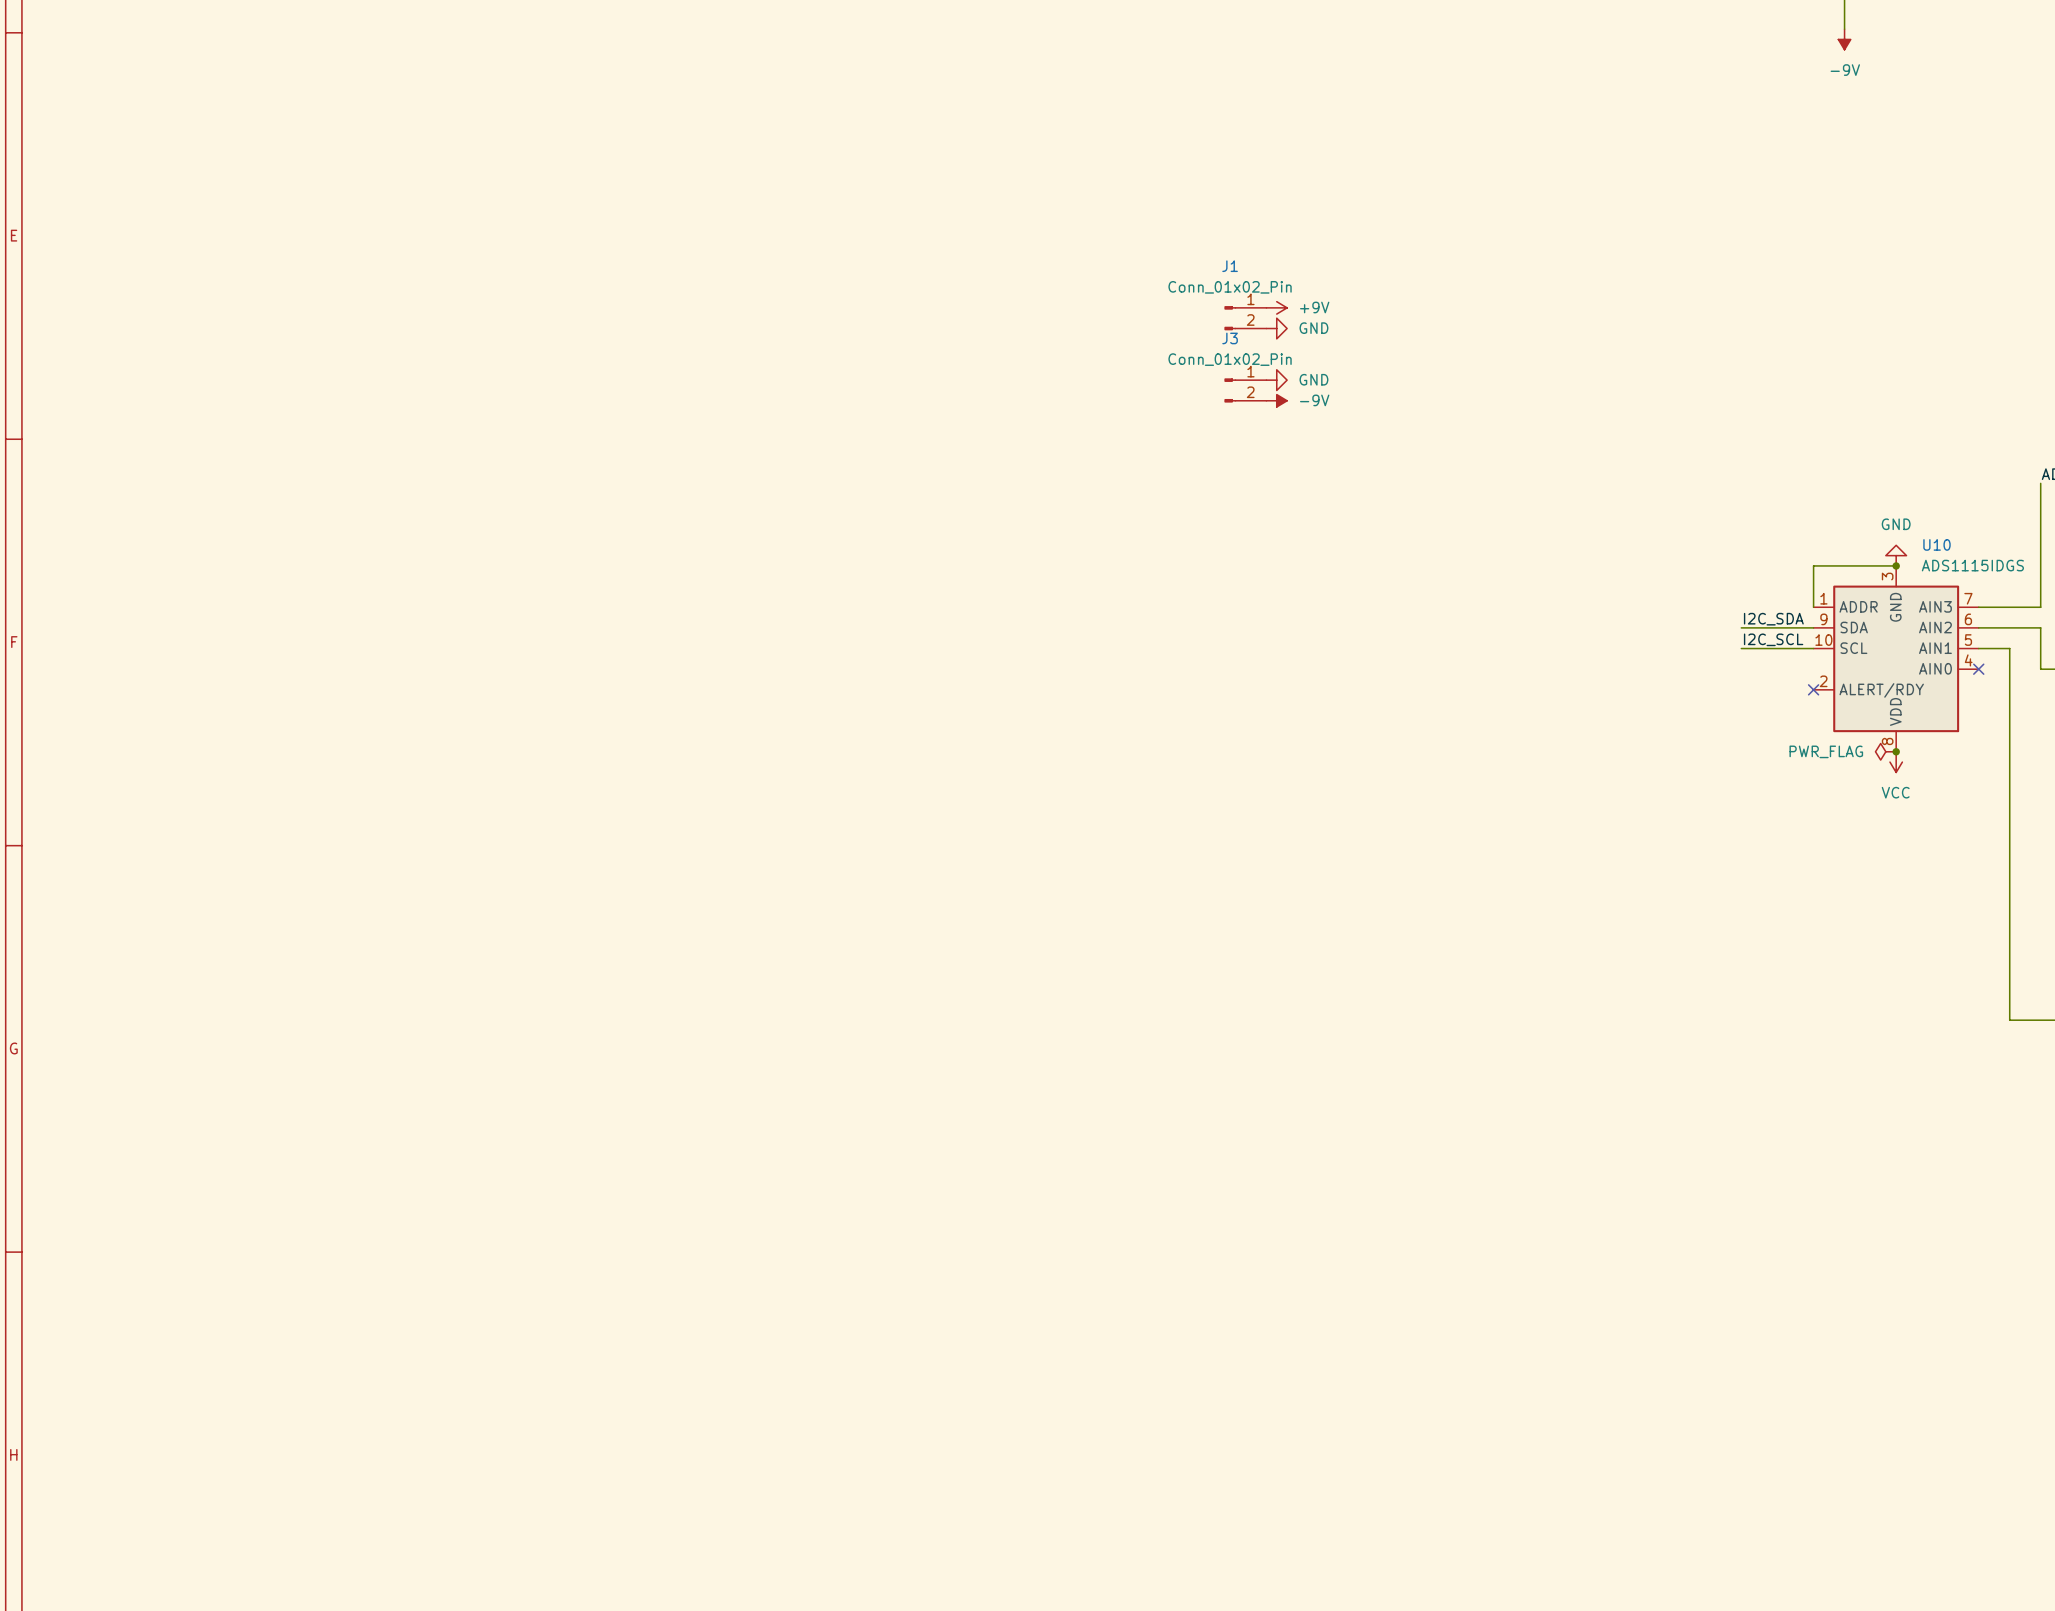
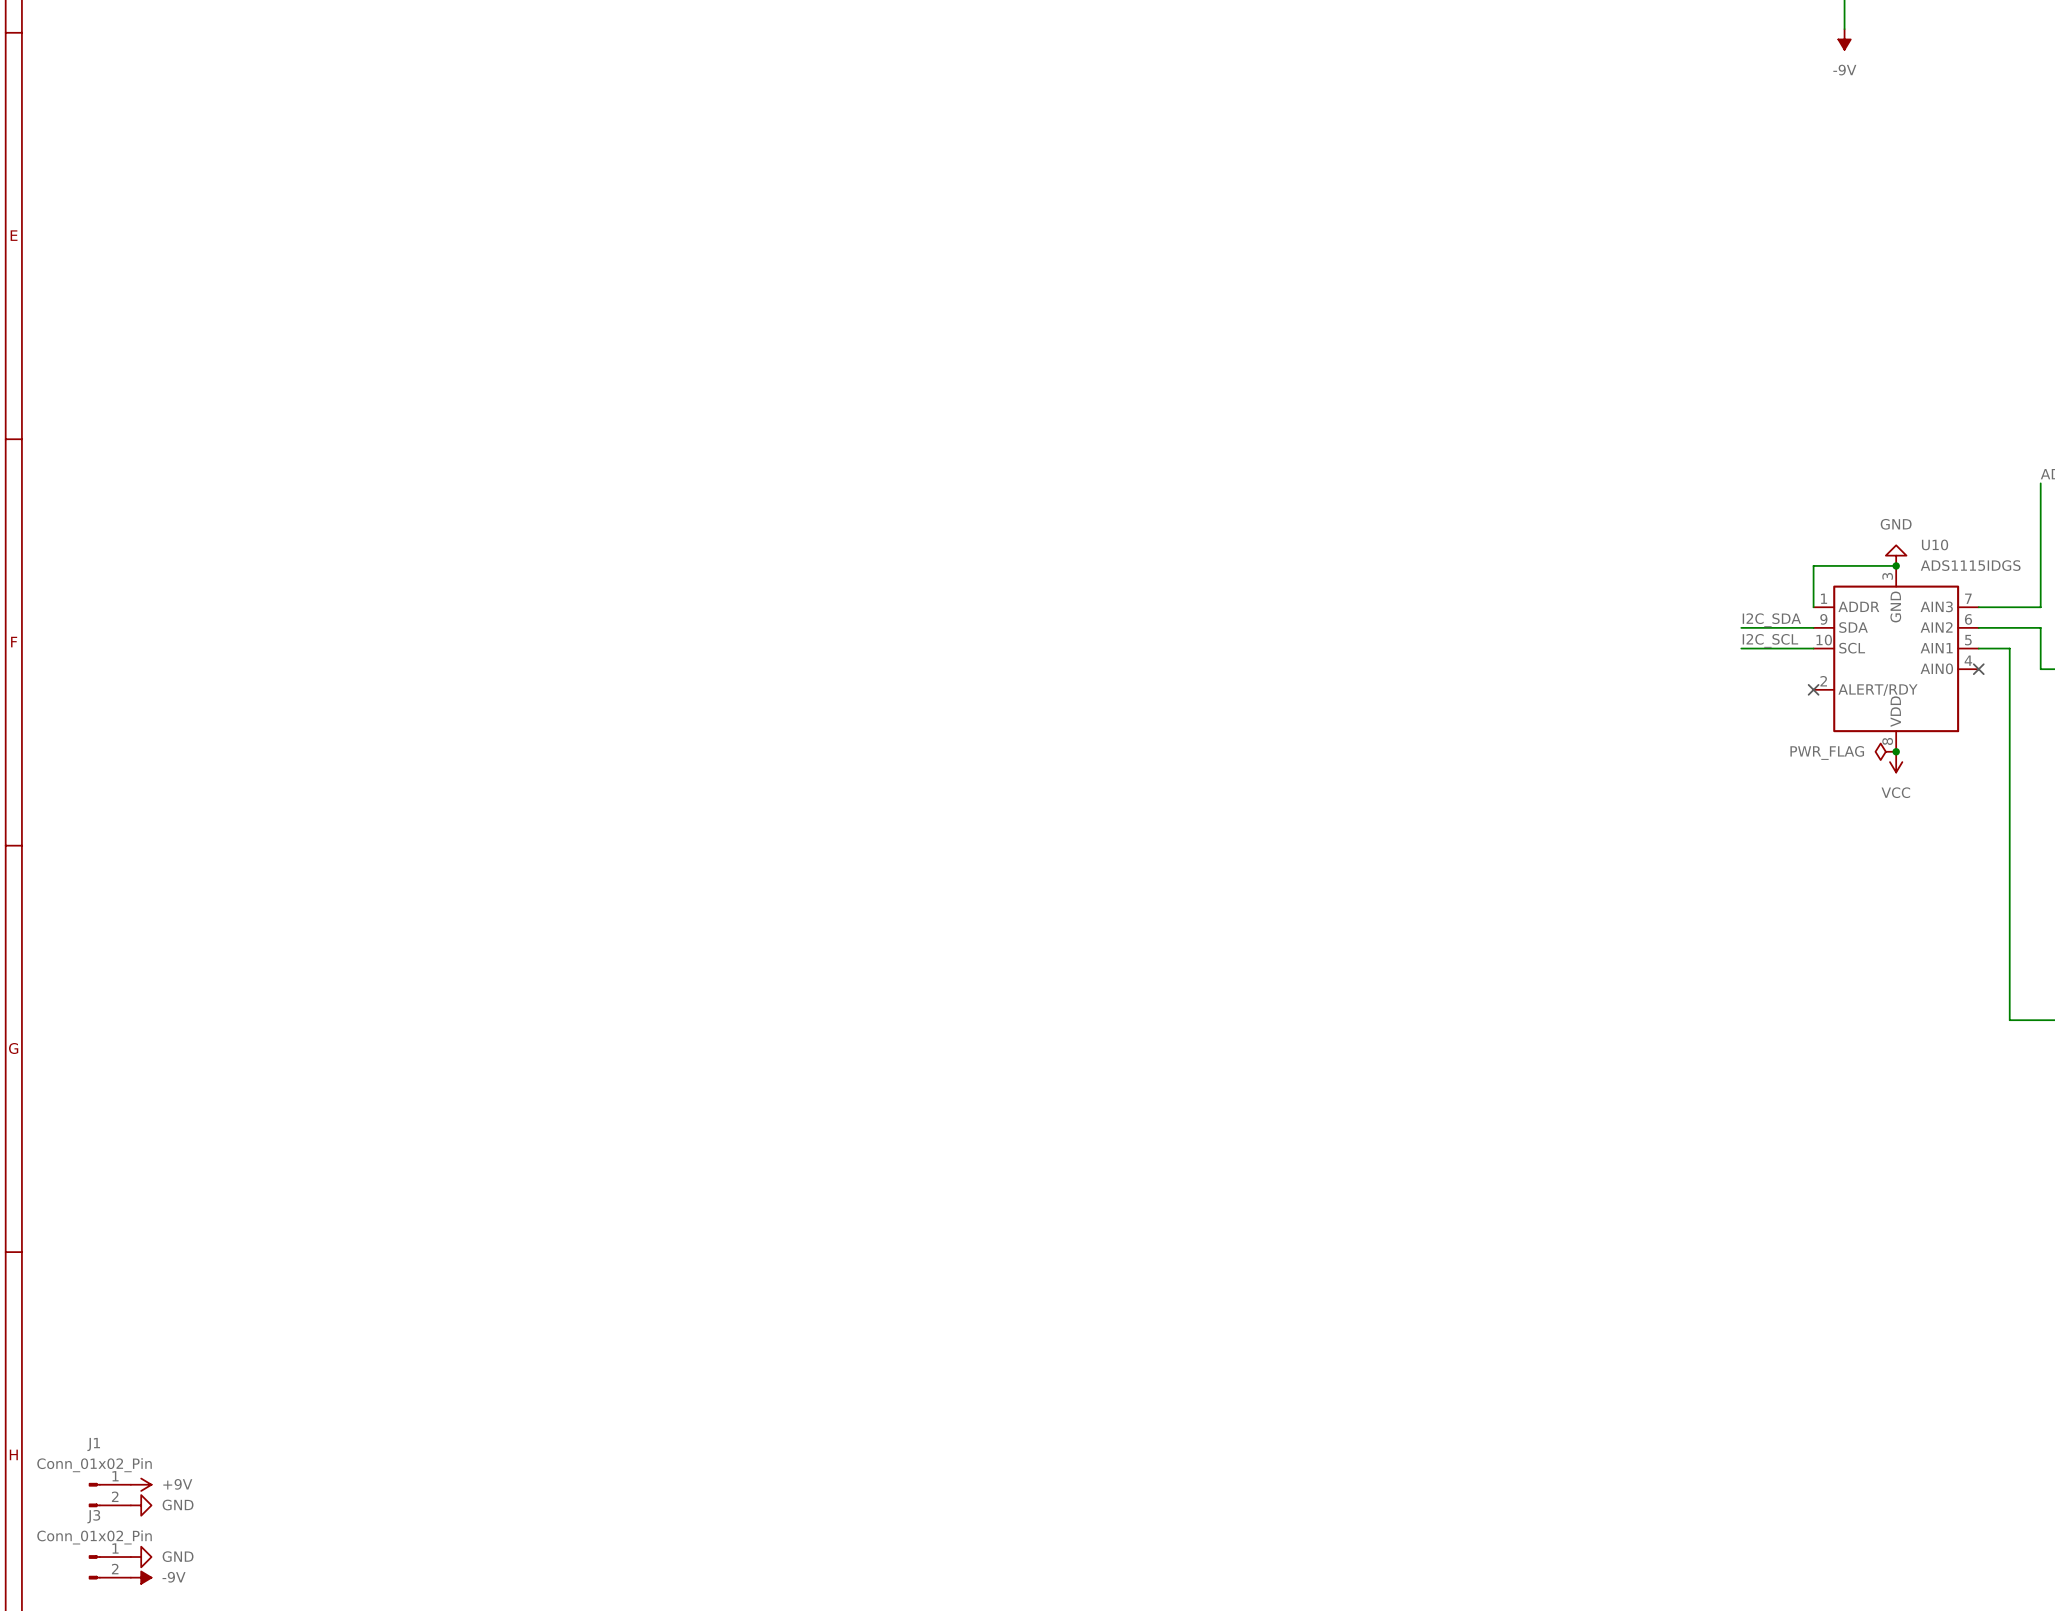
power symbol: +9V (1276, 307) -> none
J1 position: (1245, 318) -> (109, 1495)
power symbol: GND (1276, 328) -> none
power symbol: GND (1276, 380) -> none
J3 position: (1245, 390) -> (109, 1567)
power symbol: -9V (1276, 400) -> none
power symbol: none -> +9V (141, 1484)
power symbol: none -> GND (141, 1505)
power symbol: none -> GND (141, 1557)
power symbol: none -> -9V (141, 1577)

